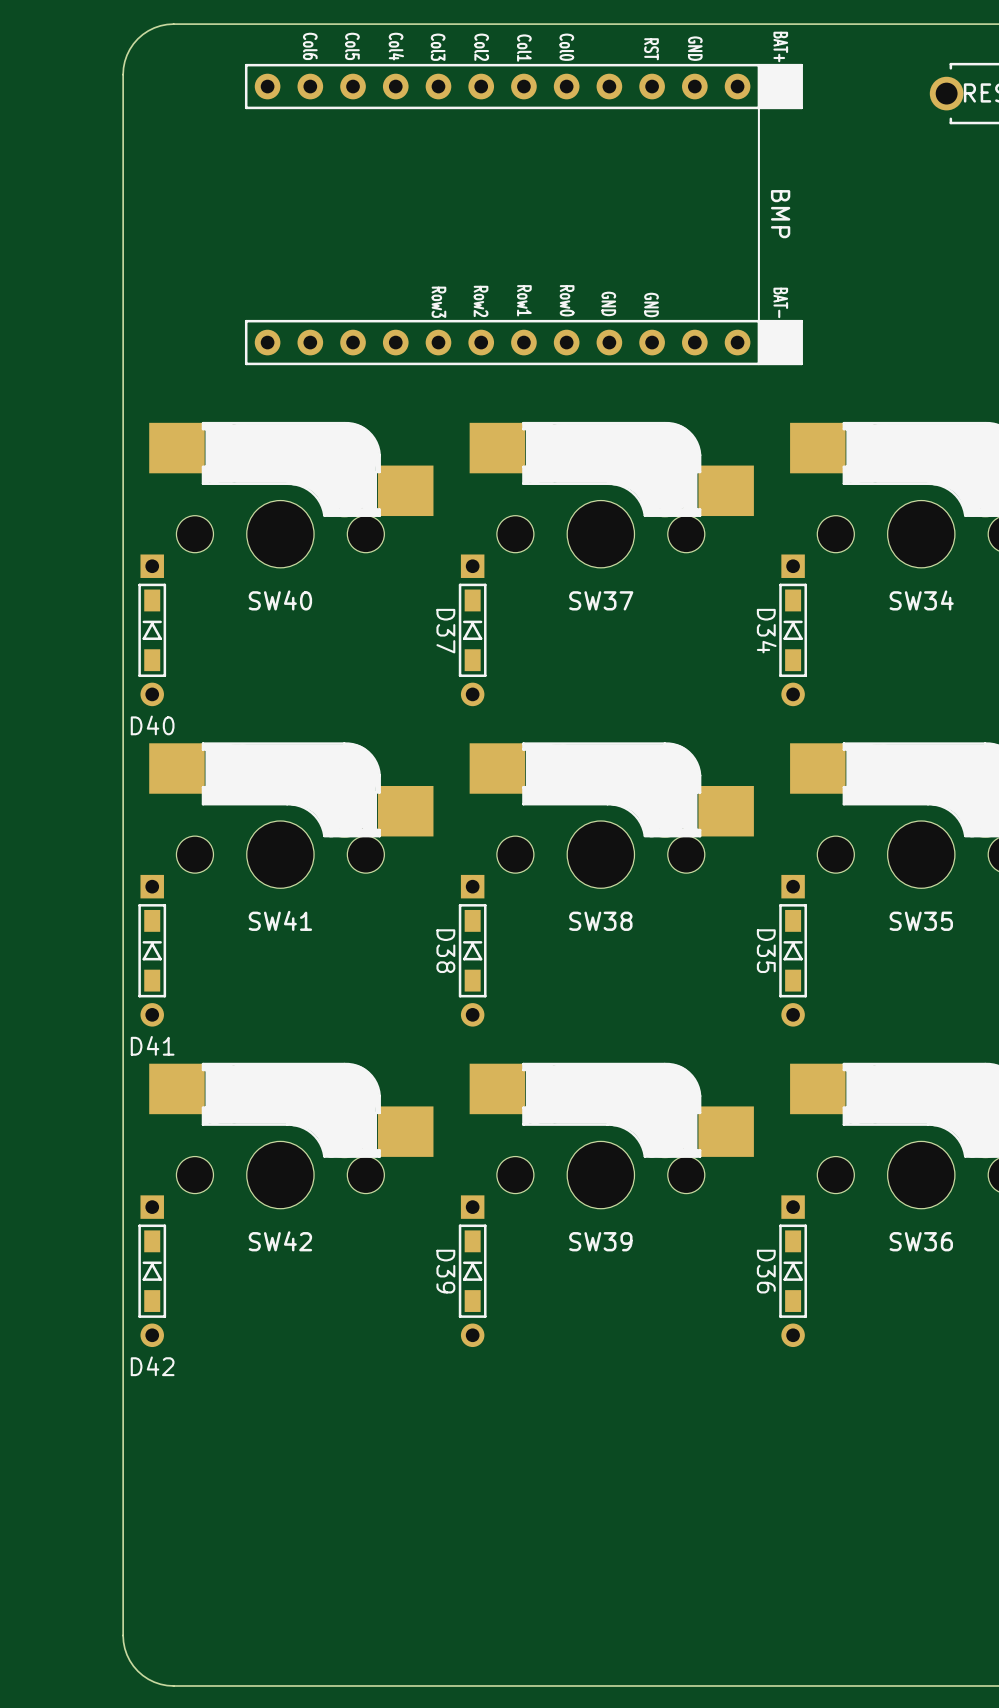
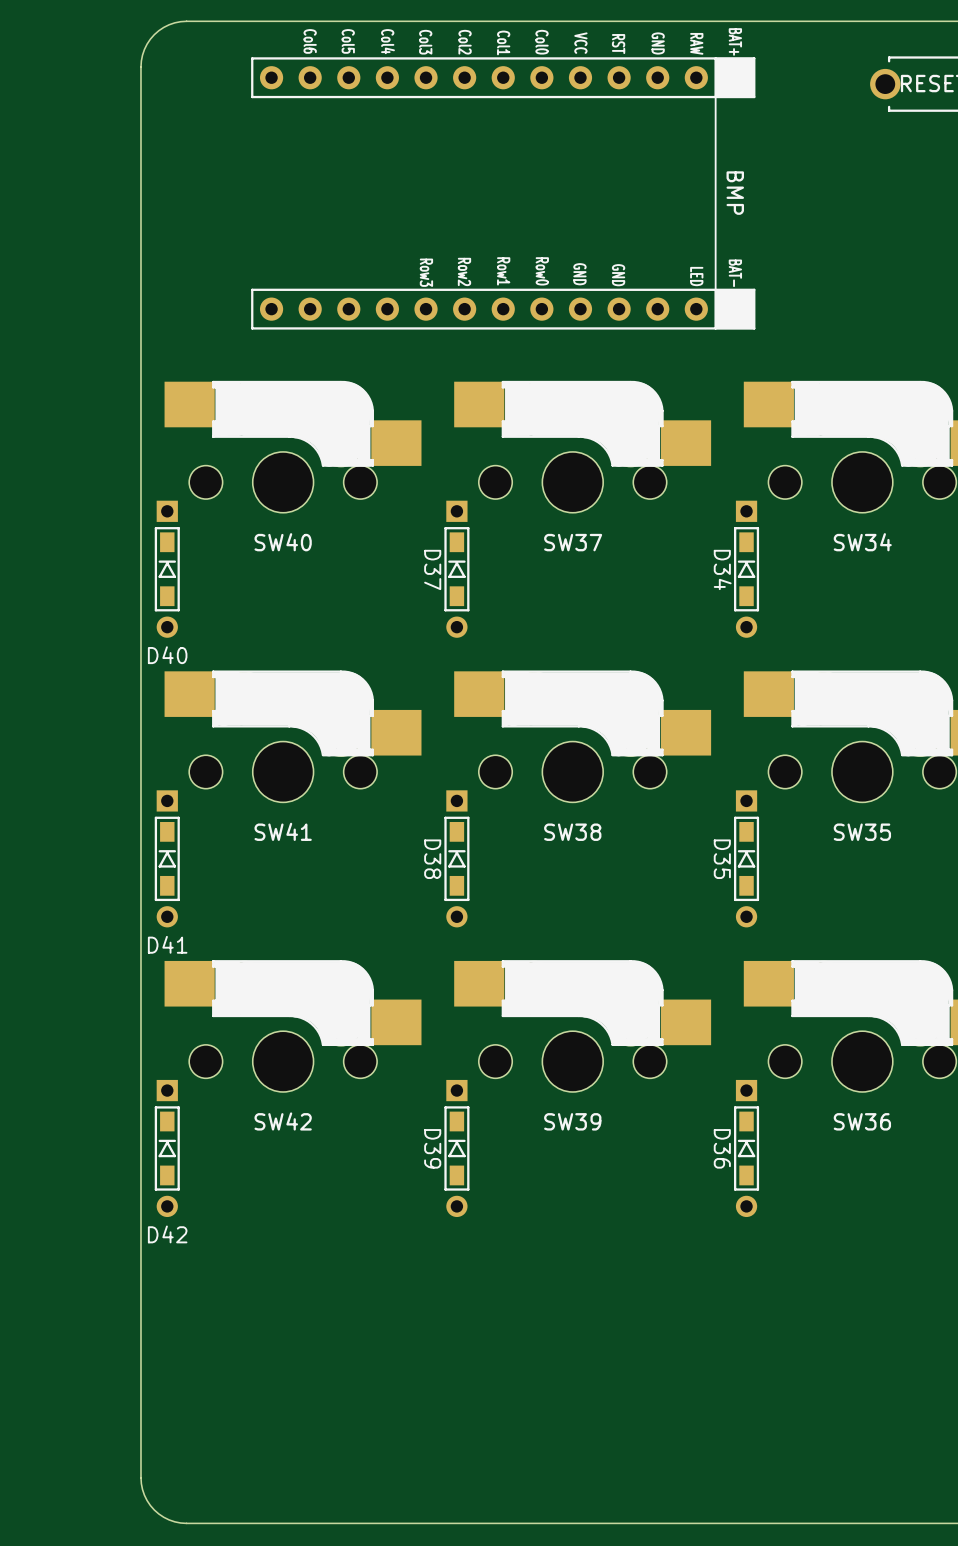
part text: none -> VCC (580, 43)
part text: none -> RAW (696, 43)
part text: none -> LED (696, 276)

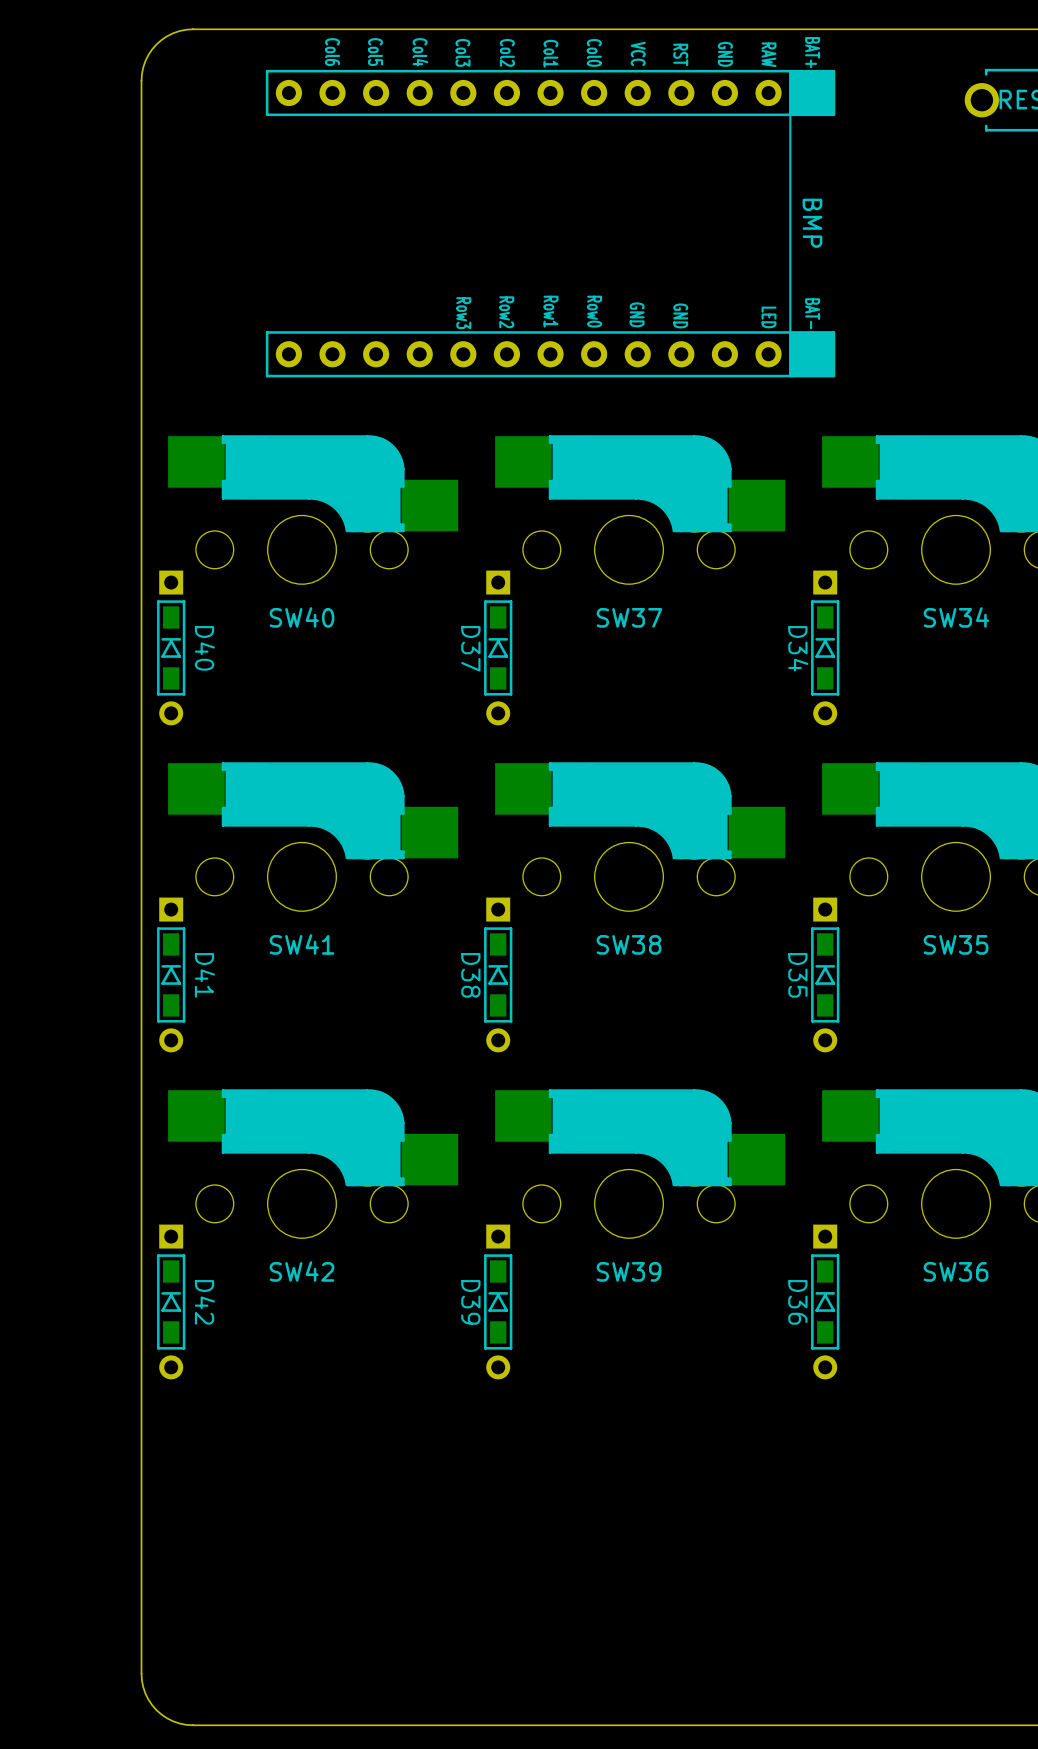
D40 name rotation: 0° (167, 655) -> 90° clockwise (204, 648)
D40 name position: D40 (167, 655) -> D40 (204, 648)
D41 name rotation: 0° (167, 944) -> 90° clockwise (204, 975)
D41 name position: D41 (167, 944) -> D41 (204, 975)
D42 name rotation: 0° (167, 1234) -> 90° clockwise (204, 1302)
D42 name position: D42 (167, 1234) -> D42 (204, 1302)

